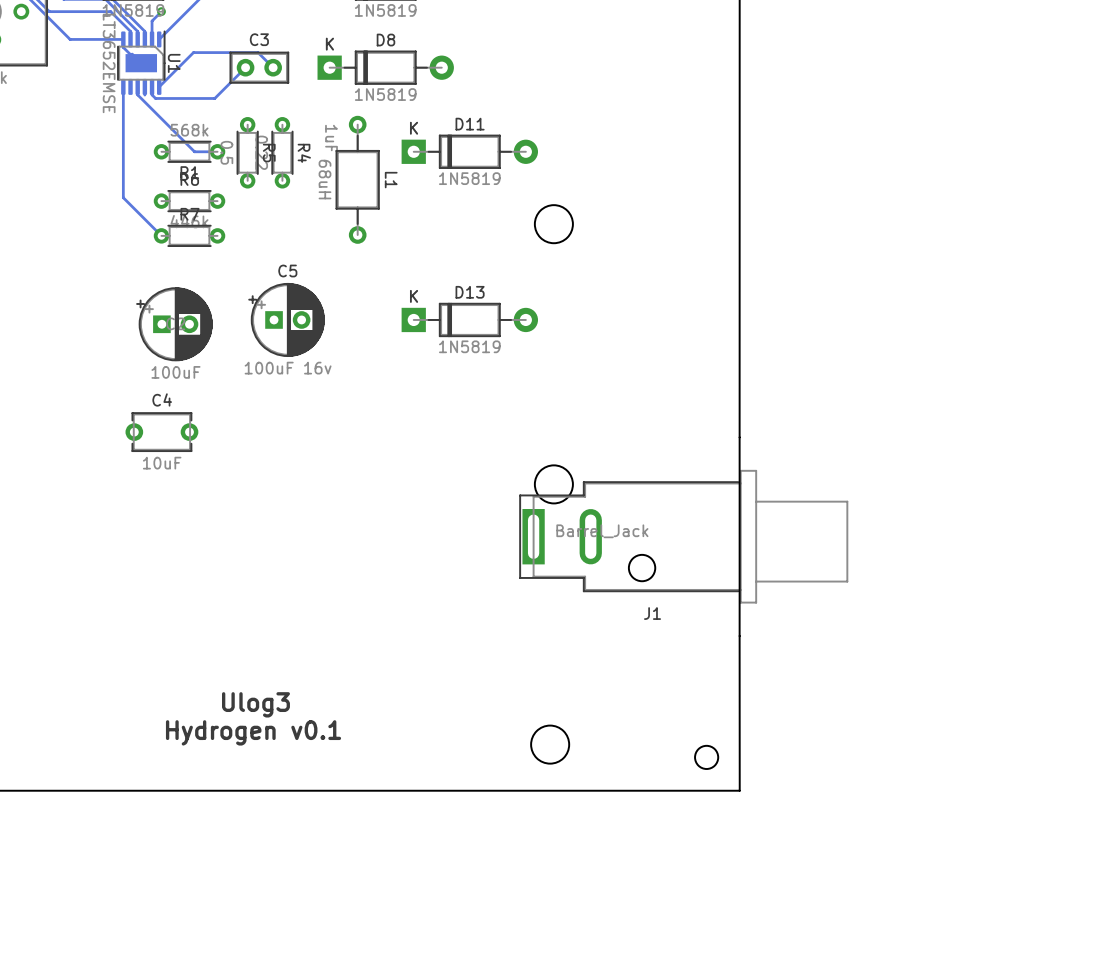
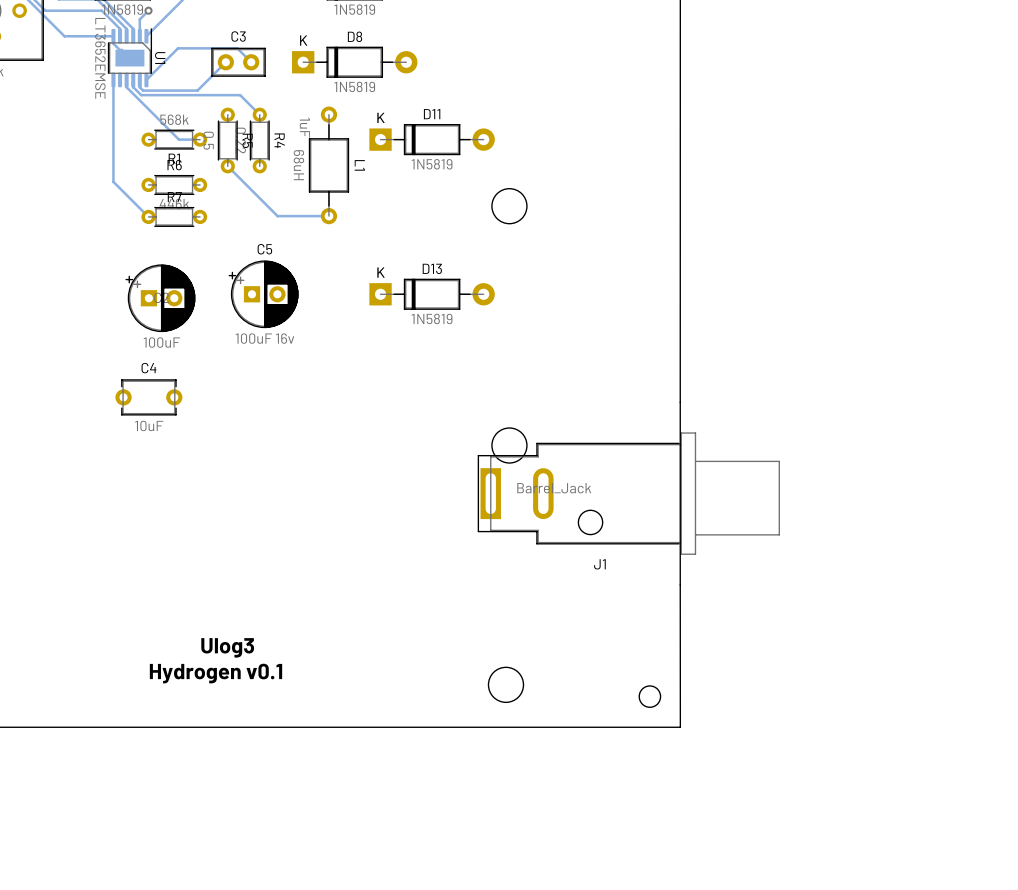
track: none -> (133, 87) (141, 95) (240, 95) (259, 114)
track: none -> (227, 166) (277, 216) (328, 216)

